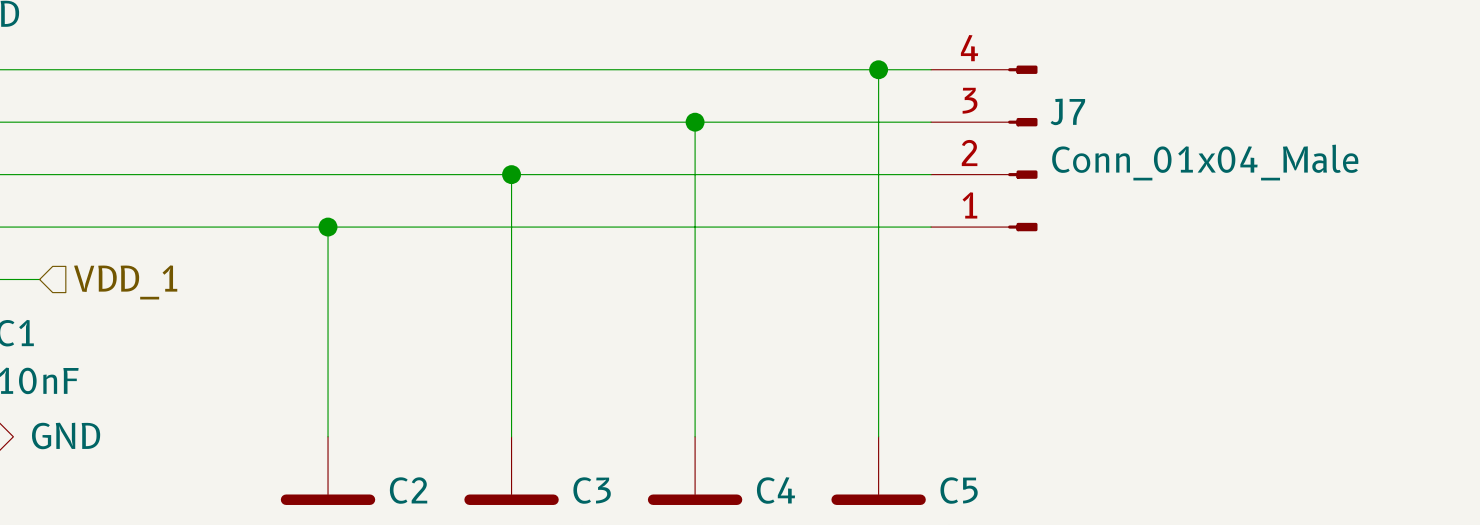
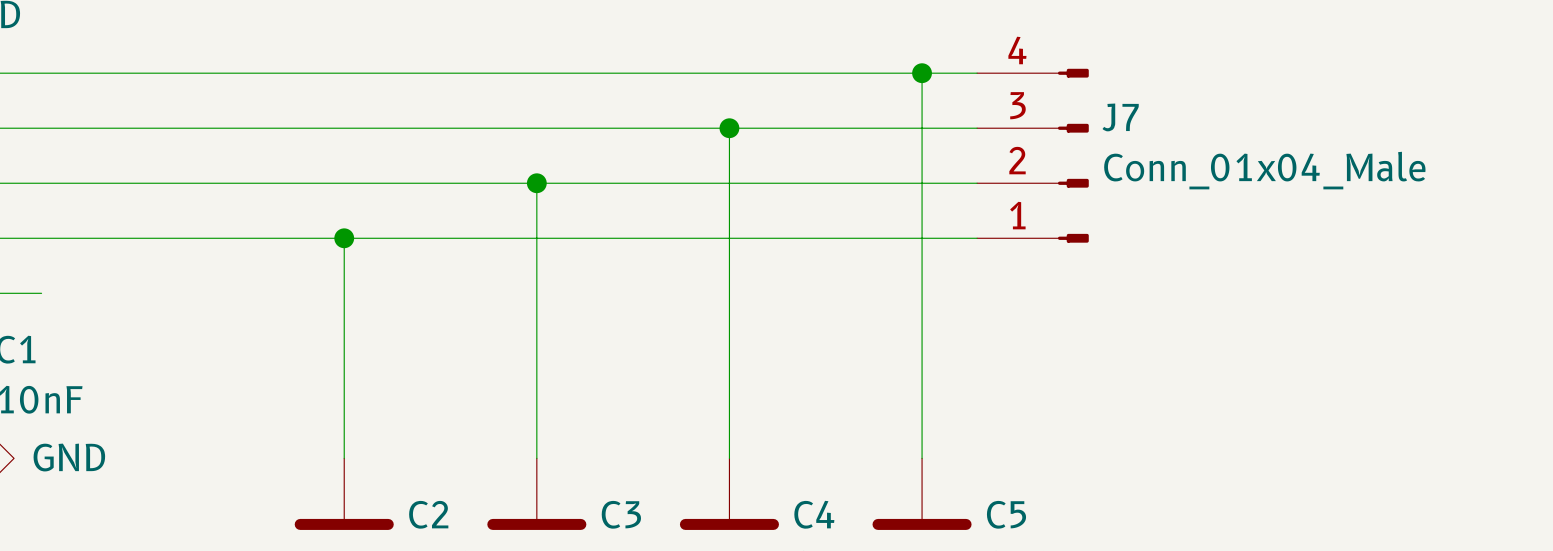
hierarchical label: VDD_1 (125, 282) -> none

